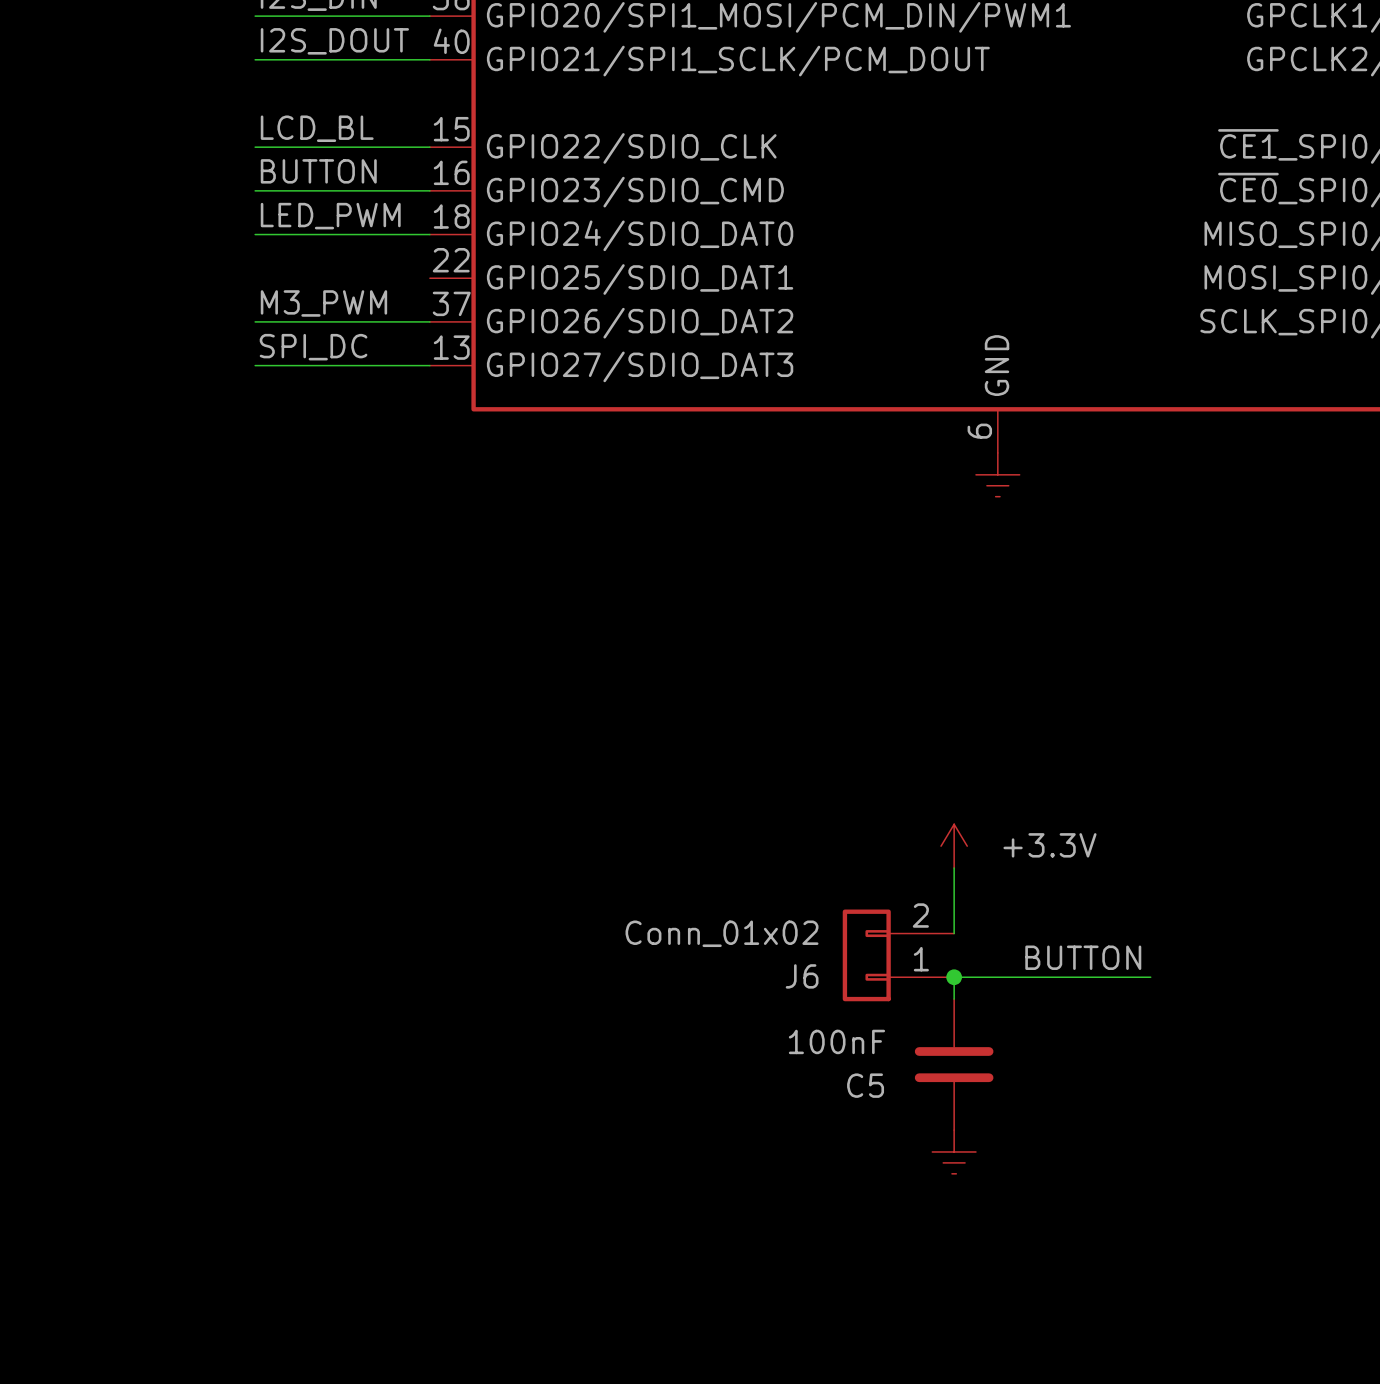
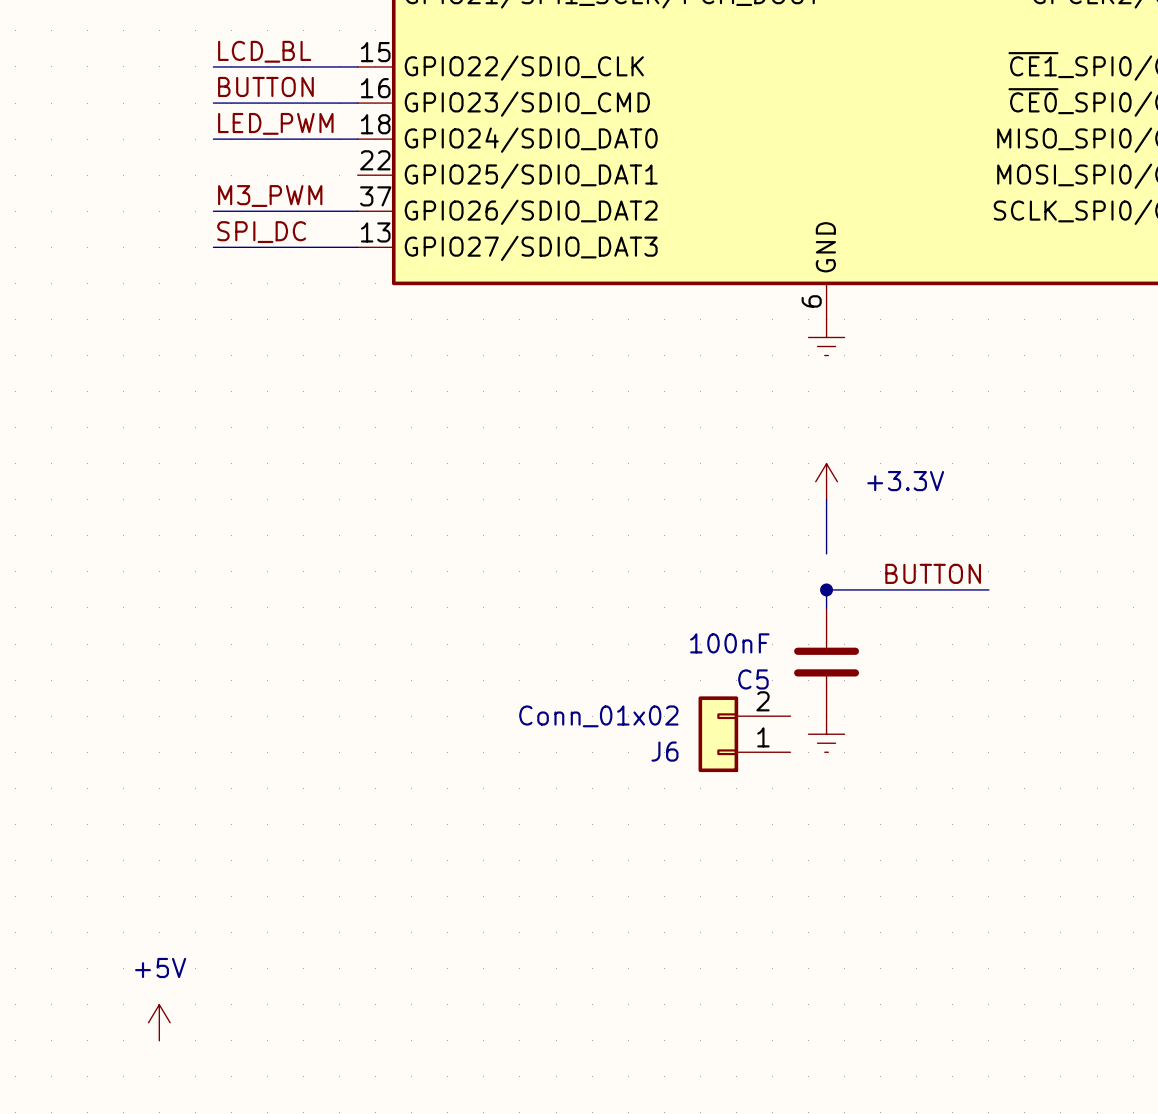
junction: none -> (826, 589)
power symbol position: +3.3V (954, 846) -> +3.3V (826, 481)
wire: (954, 868) (954, 933) -> (826, 499) (826, 553)
label position: BUTTON (1083, 957) -> BUTTON (933, 573)
junction: (954, 977) -> none
wire: (1150, 977) (954, 977) (954, 999) -> (988, 589) (826, 589) (826, 607)
C5 position: (954, 1064) -> (826, 662)
power symbol position: (954, 1151) -> (826, 734)
power symbol: none -> +5V (159, 1022)

